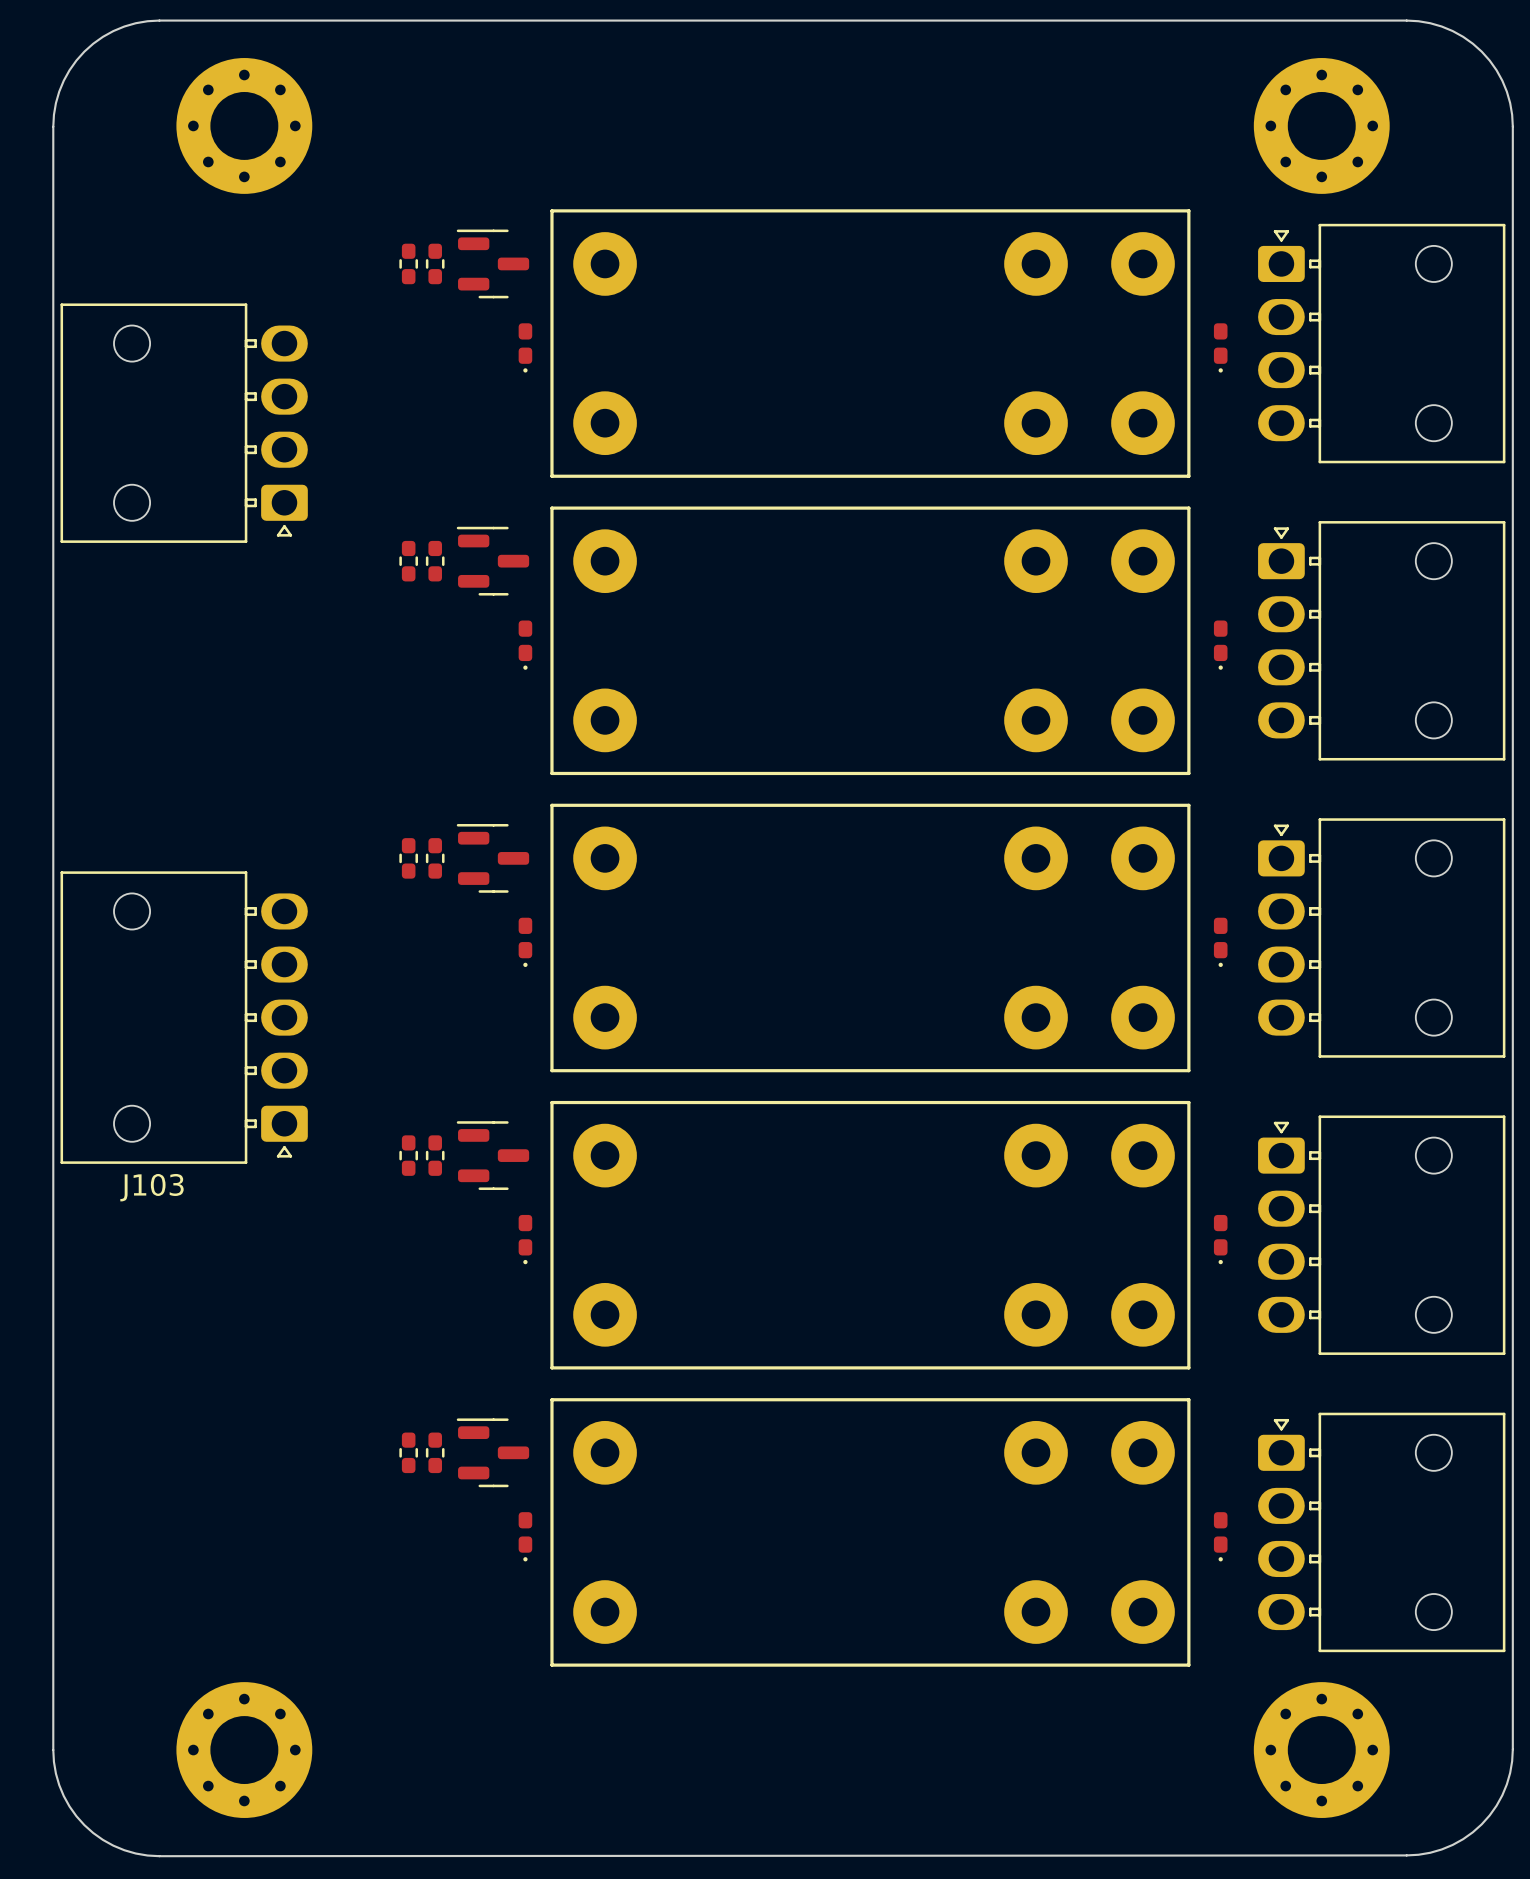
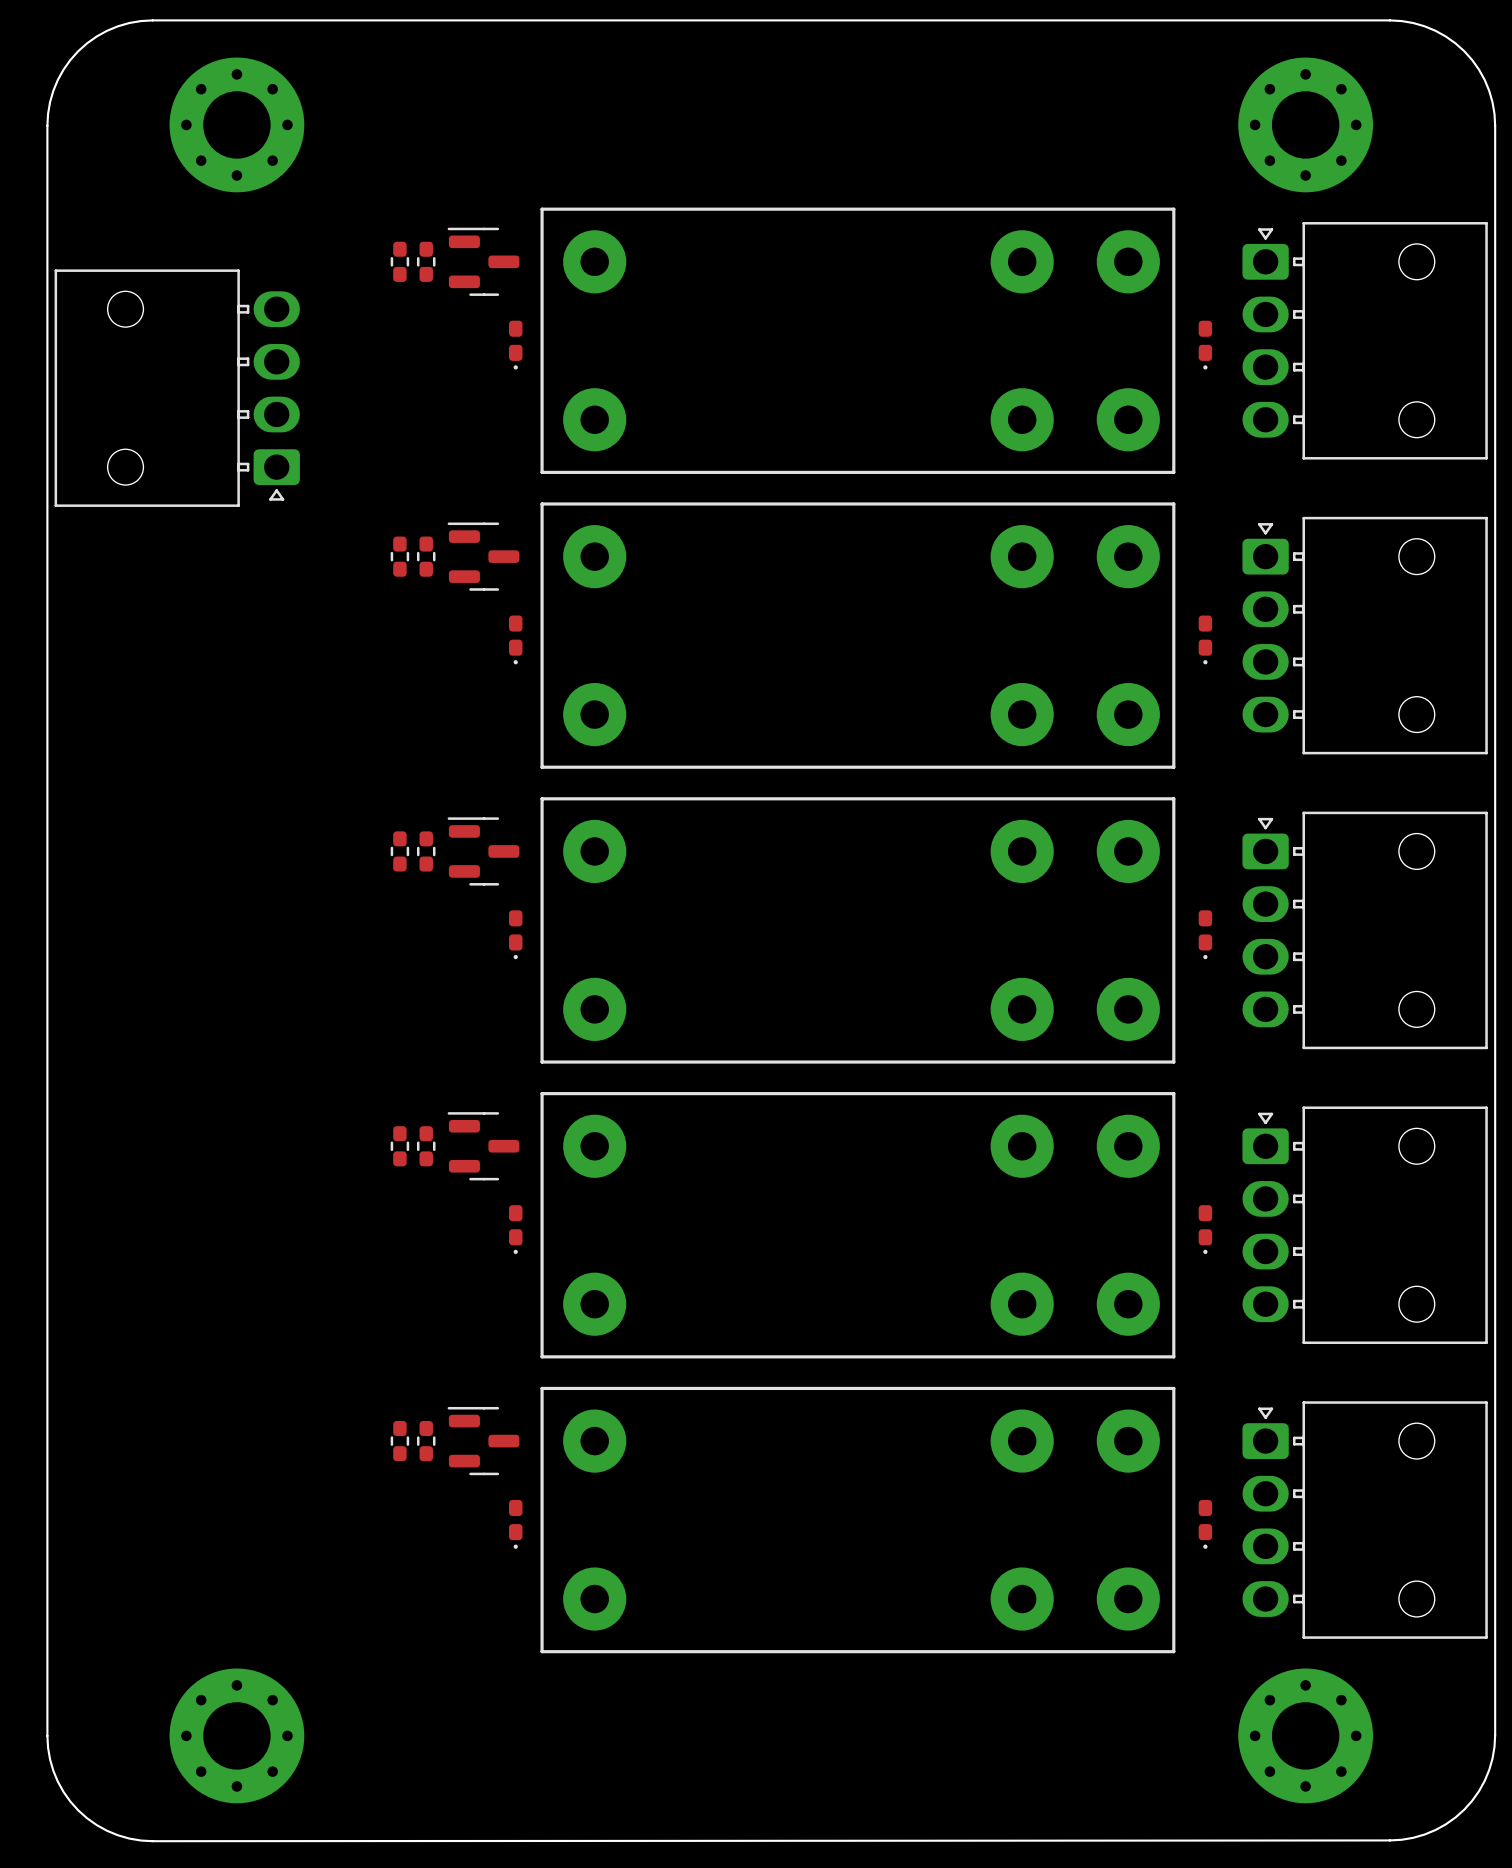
part position: (184, 423) -> (177, 388)
J103: (184, 1017) -> none

